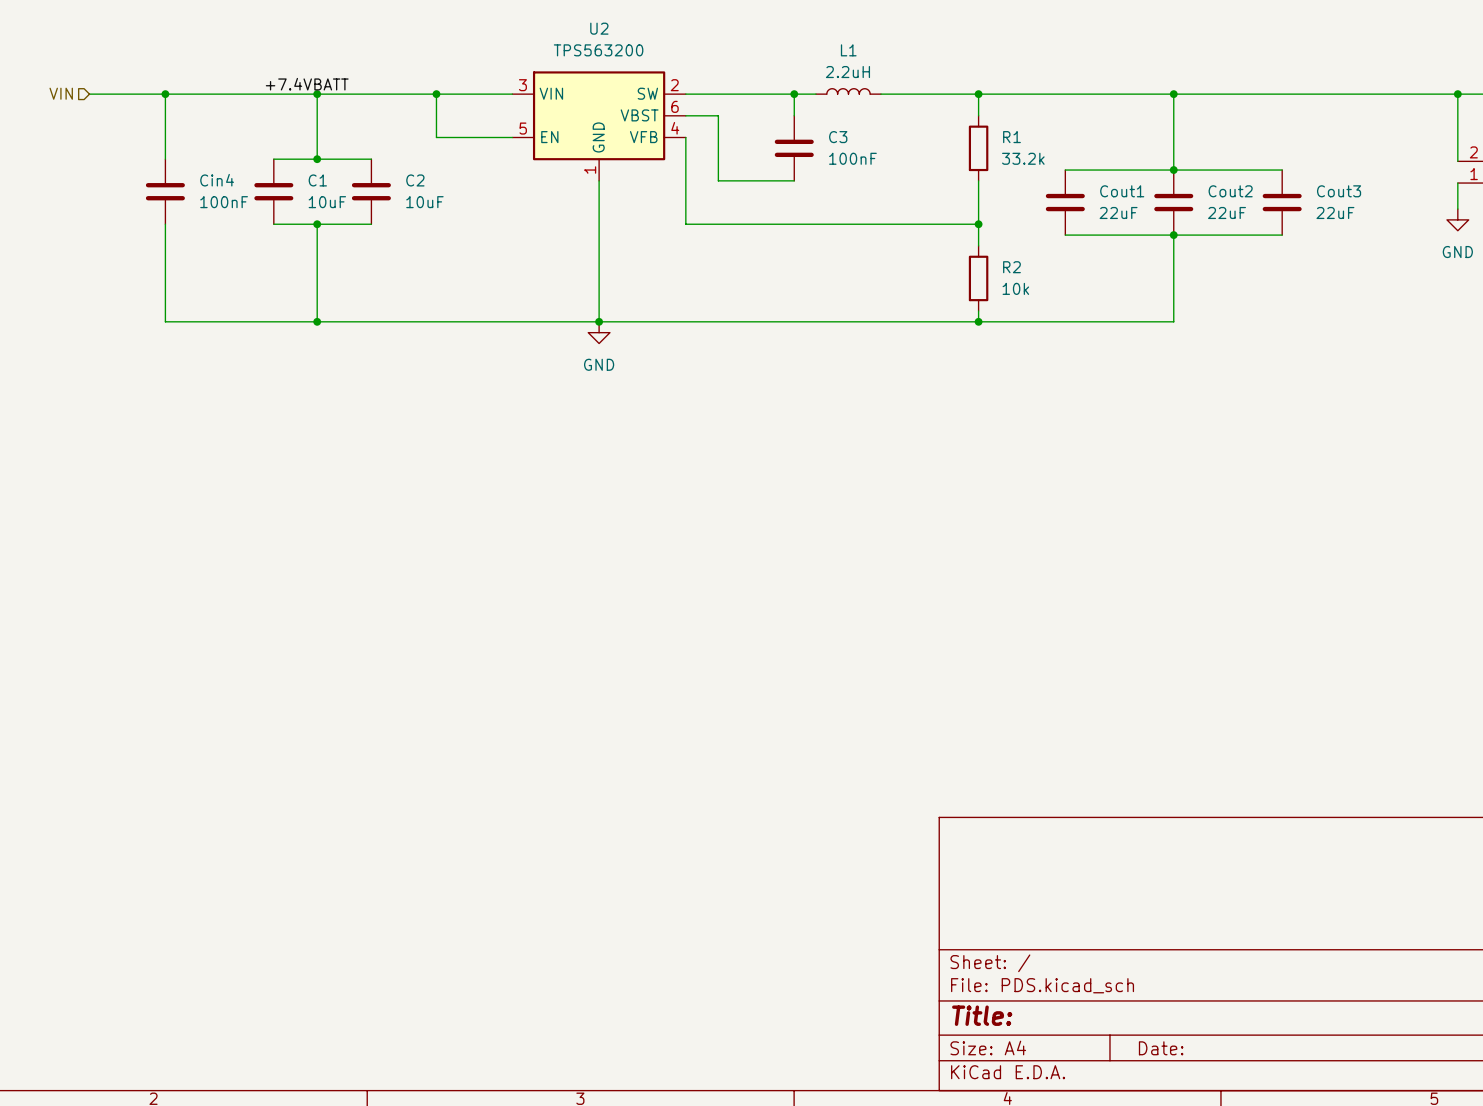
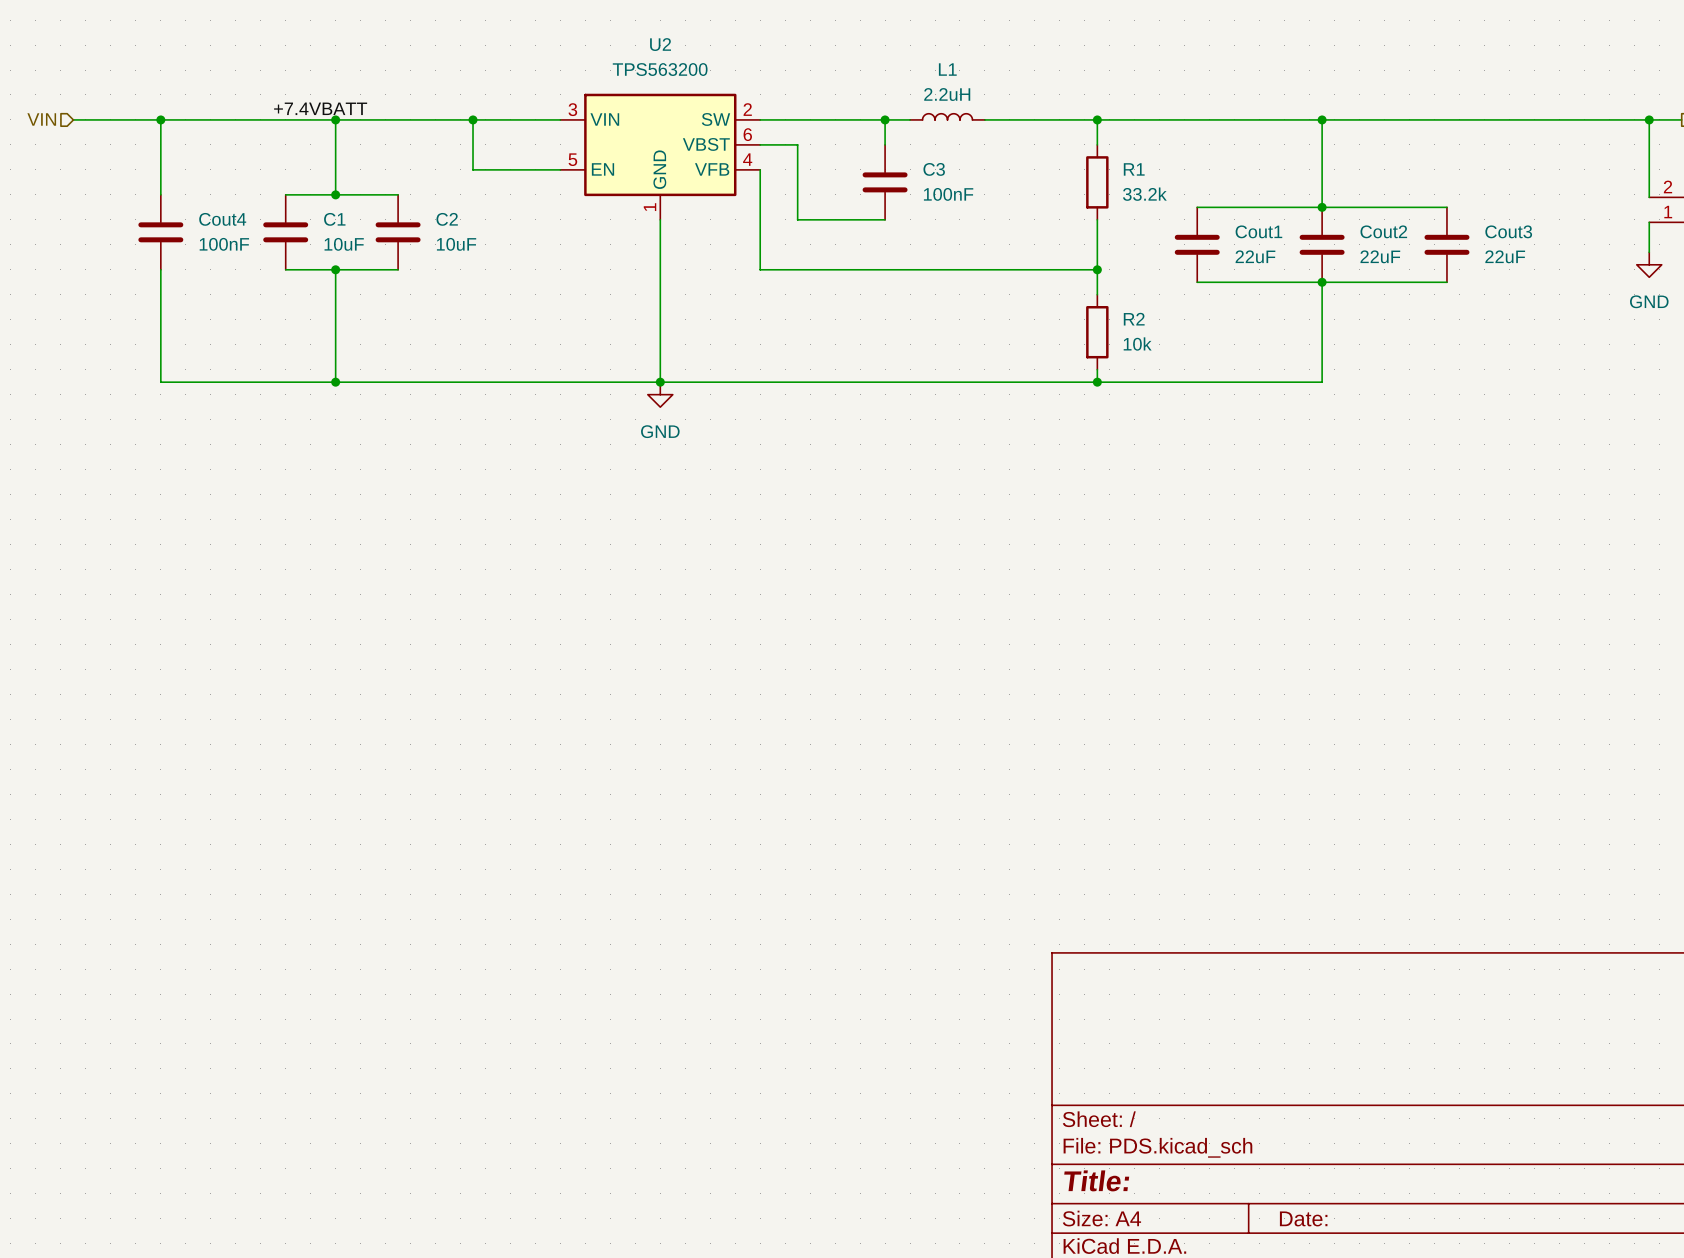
Cin4 name: Cin4 (217, 180) -> Cout4 (222, 219)

